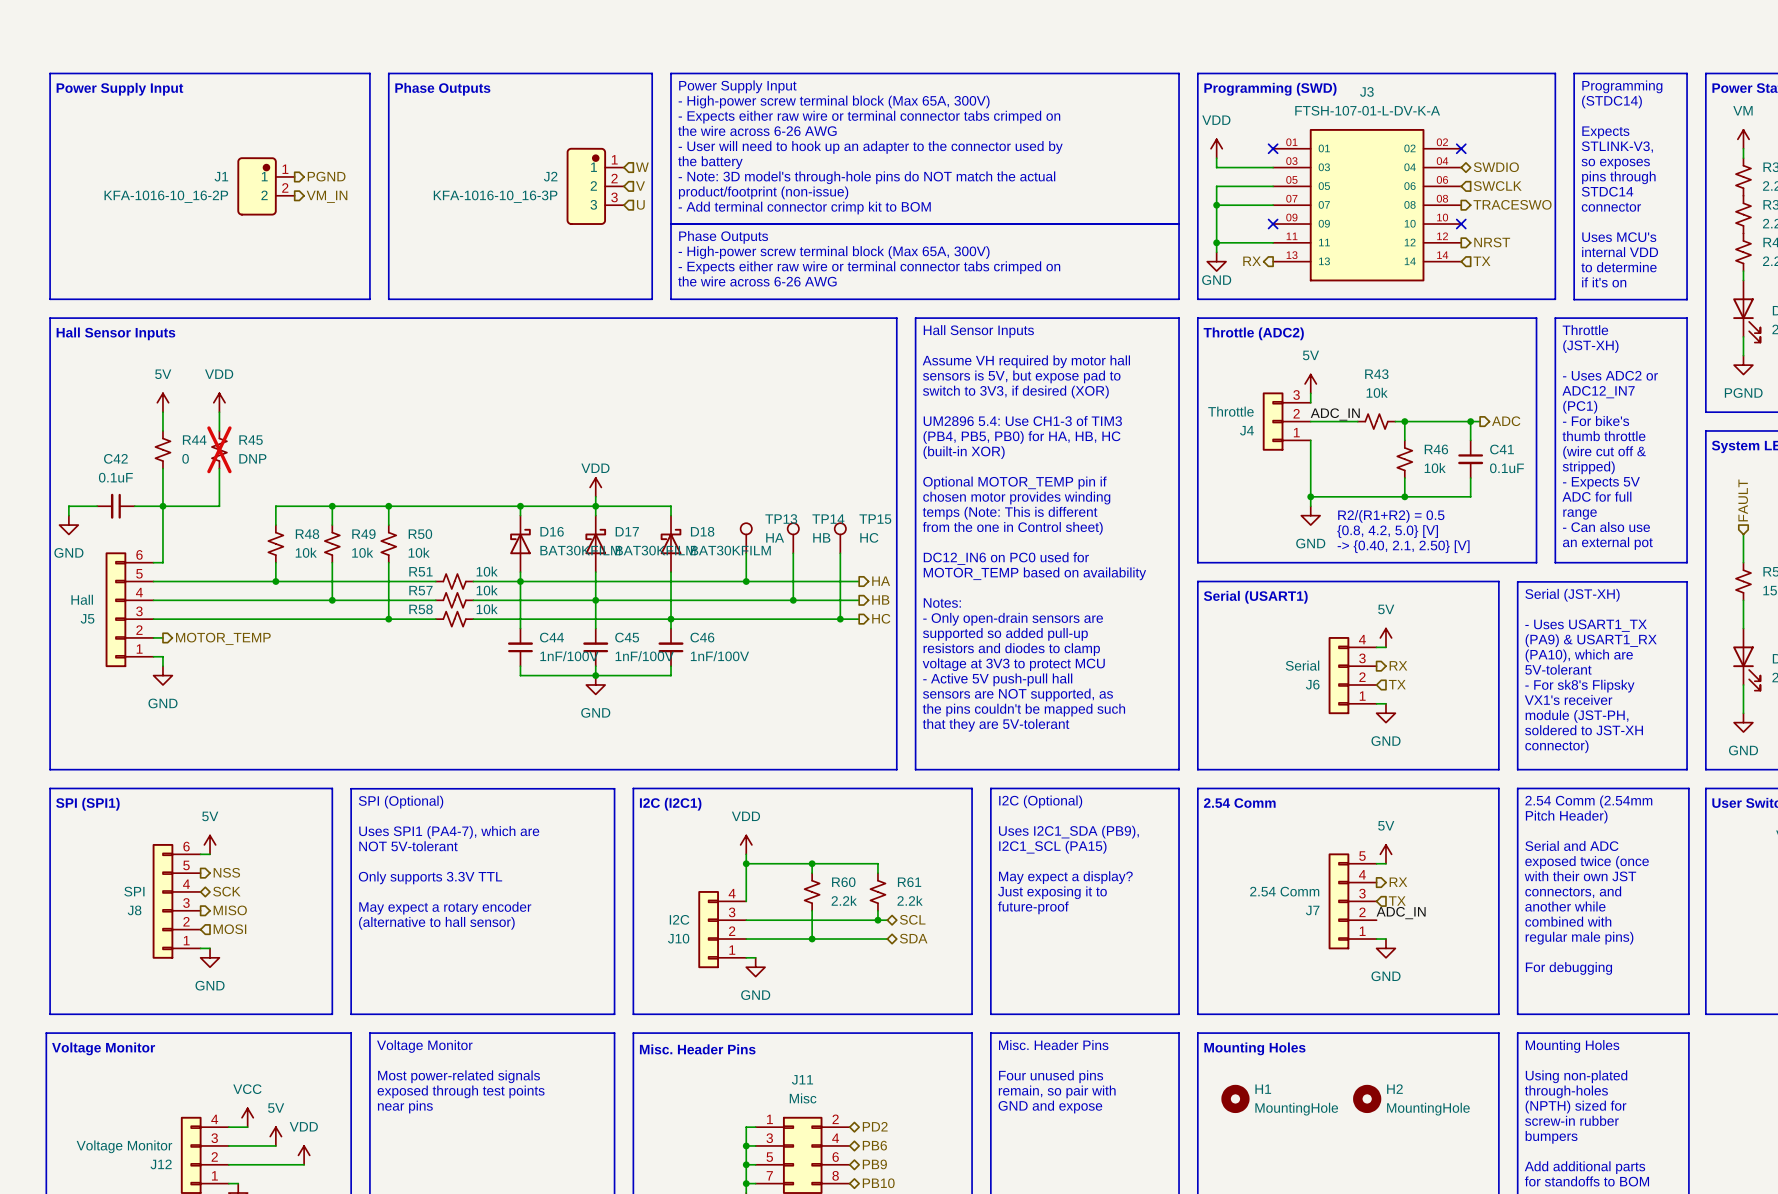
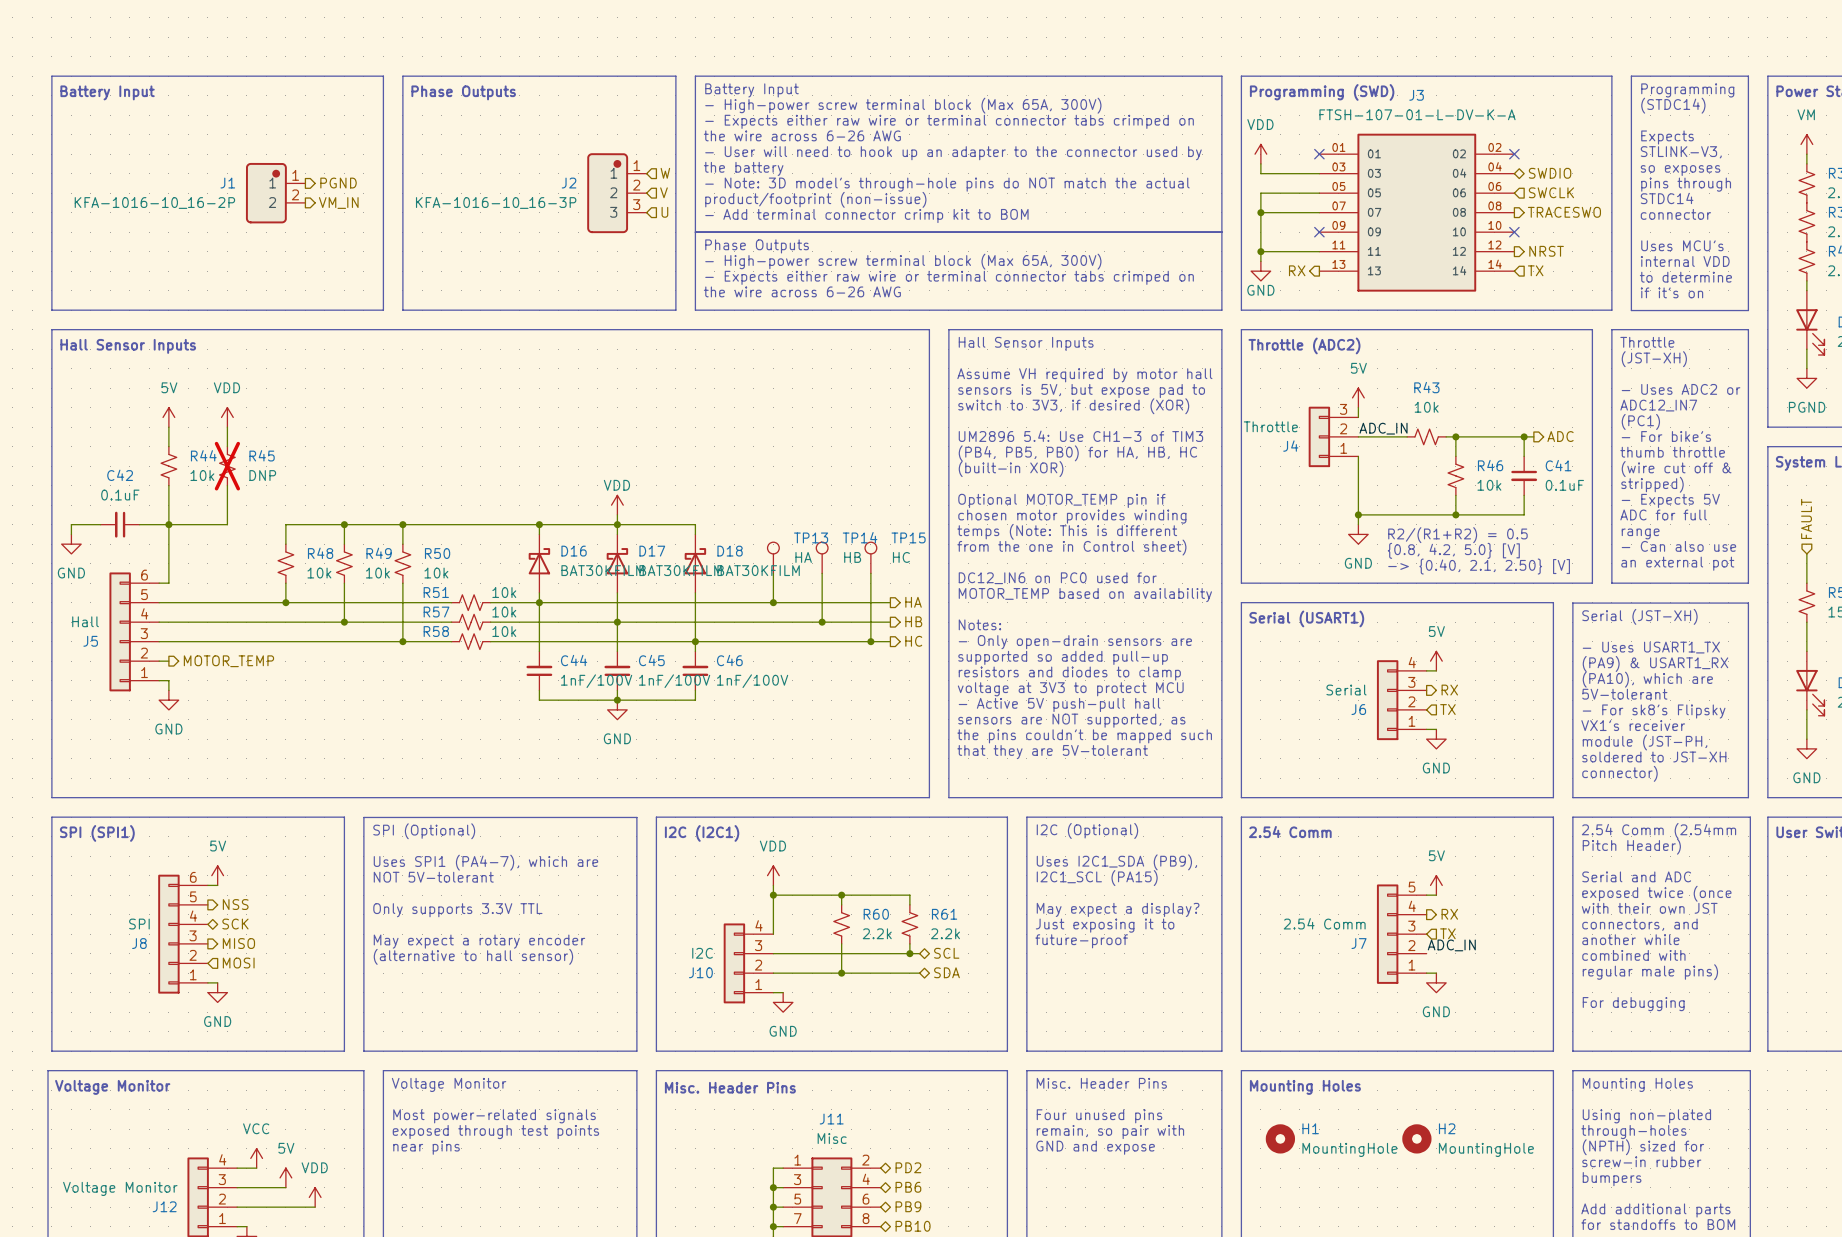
text: Power Supply Input (737, 86) -> Battery Input (752, 90)
text: Power Supply Input (119, 89) -> Battery Input (107, 92)
R44 value: 0 (185, 458) -> 10k (202, 475)

